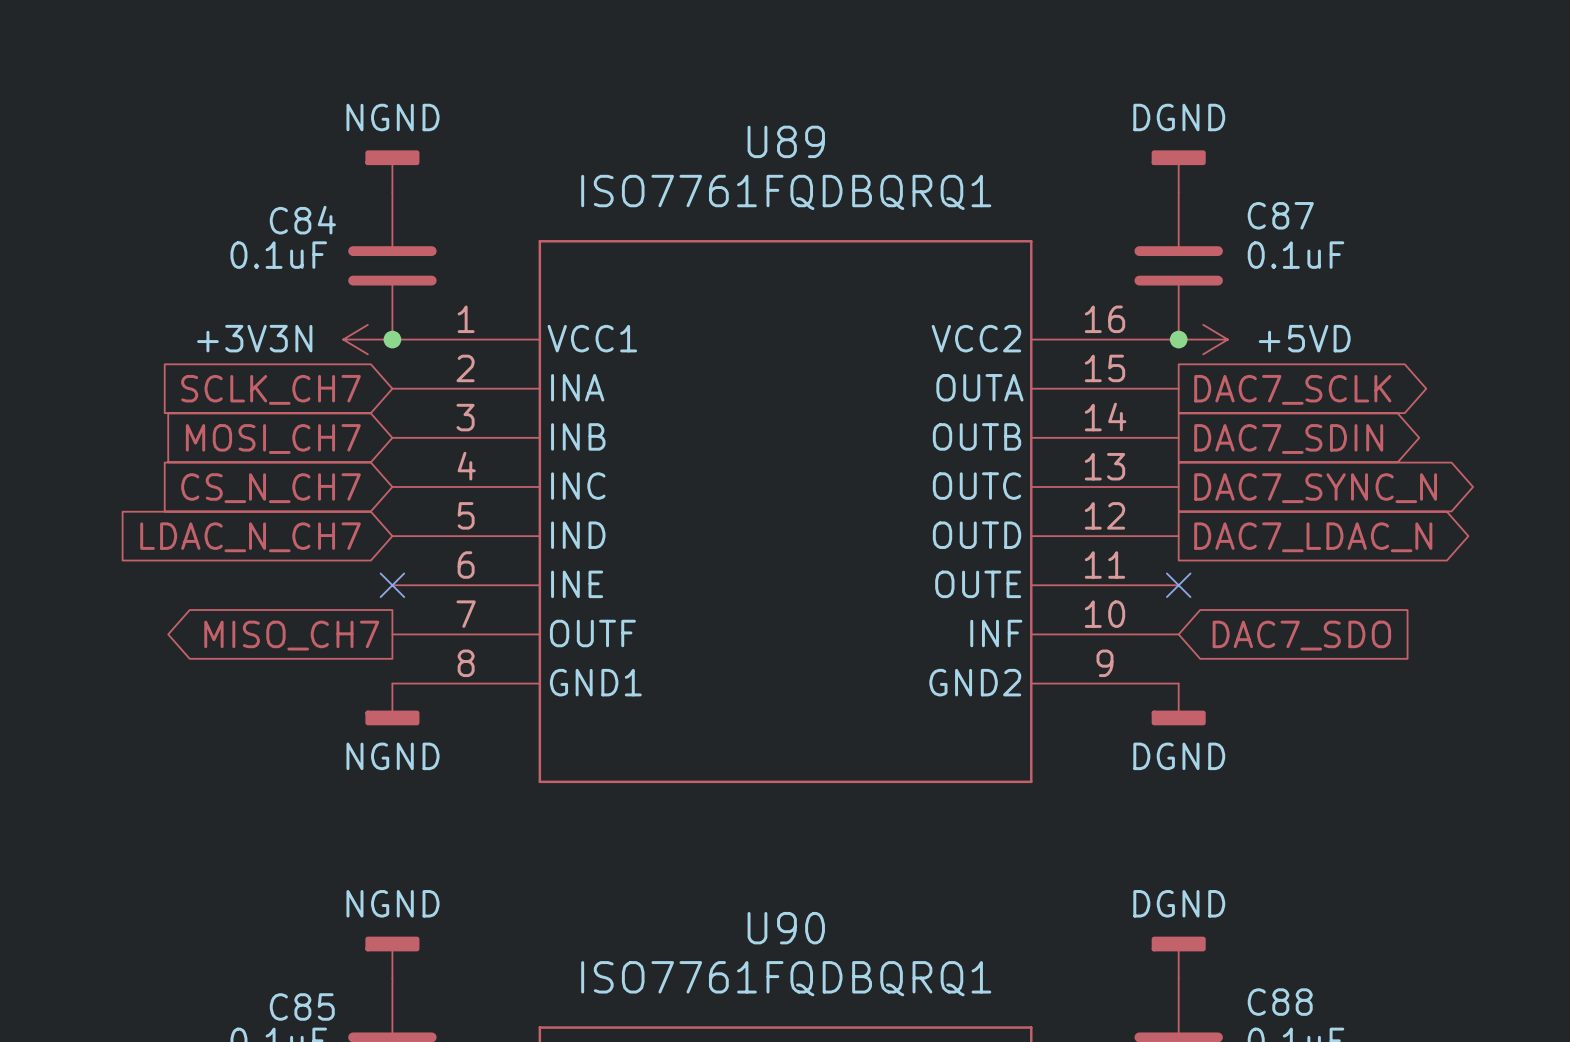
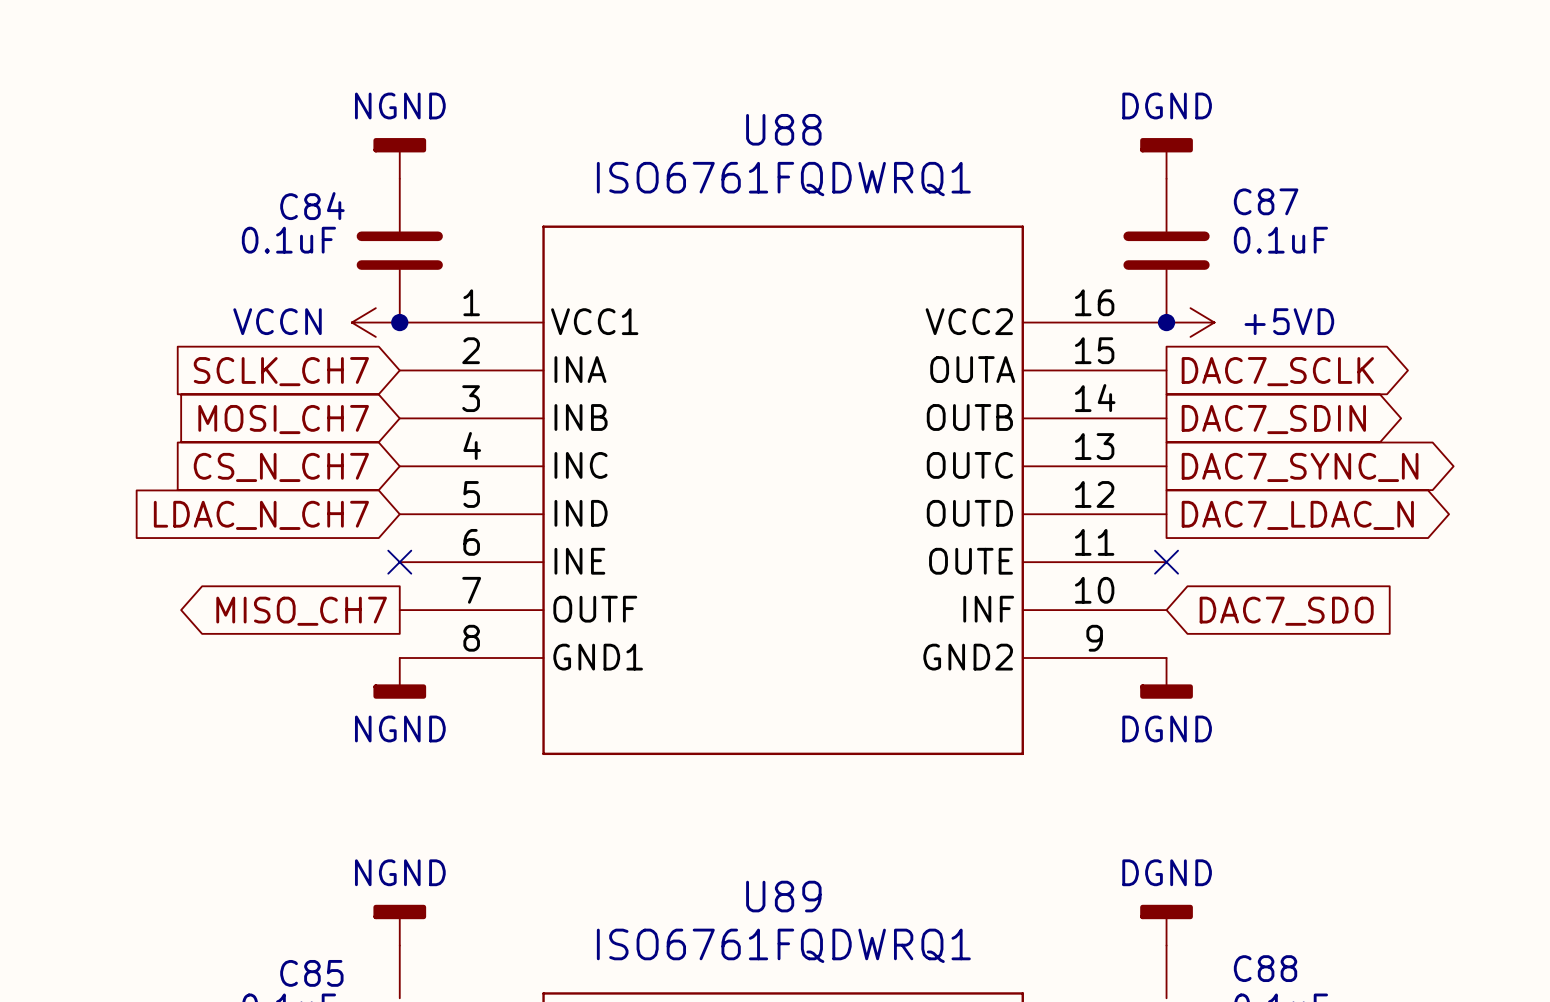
U89 name: U89 (786, 141) -> U88 (783, 129)
U89 value: ISO7761FQDBQRQ1 (786, 192) -> ISO6761FQDWRQ1 (783, 179)
power symbol: +3V3N (367, 339) -> VCCN (375, 322)
U90 name: U90 (786, 928) -> U89 (783, 896)
U90 value: ISO7761FQDBQRQ1 (786, 978) -> ISO6761FQDWRQ1 (783, 945)

